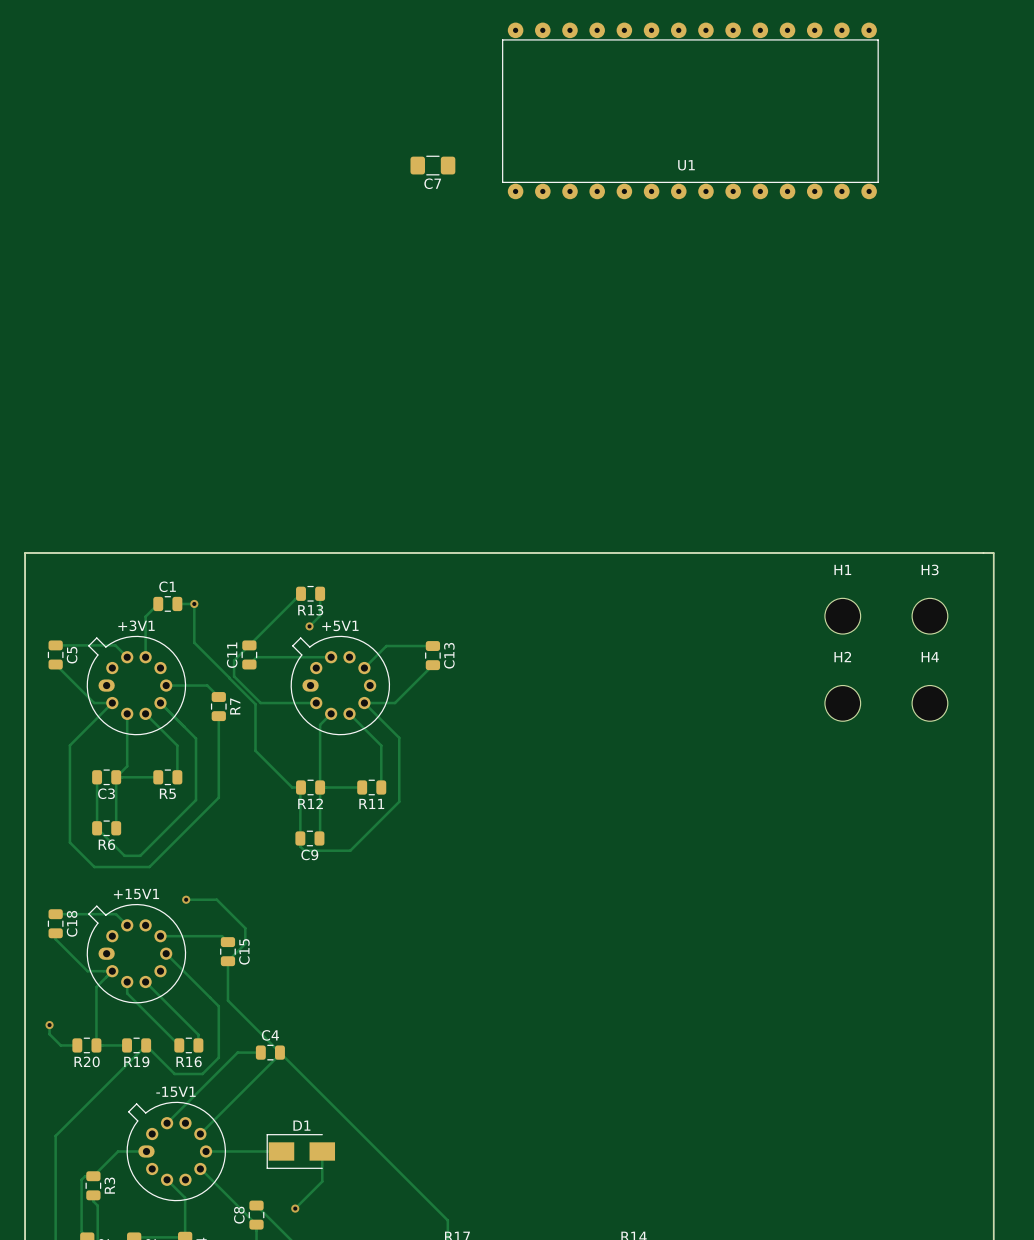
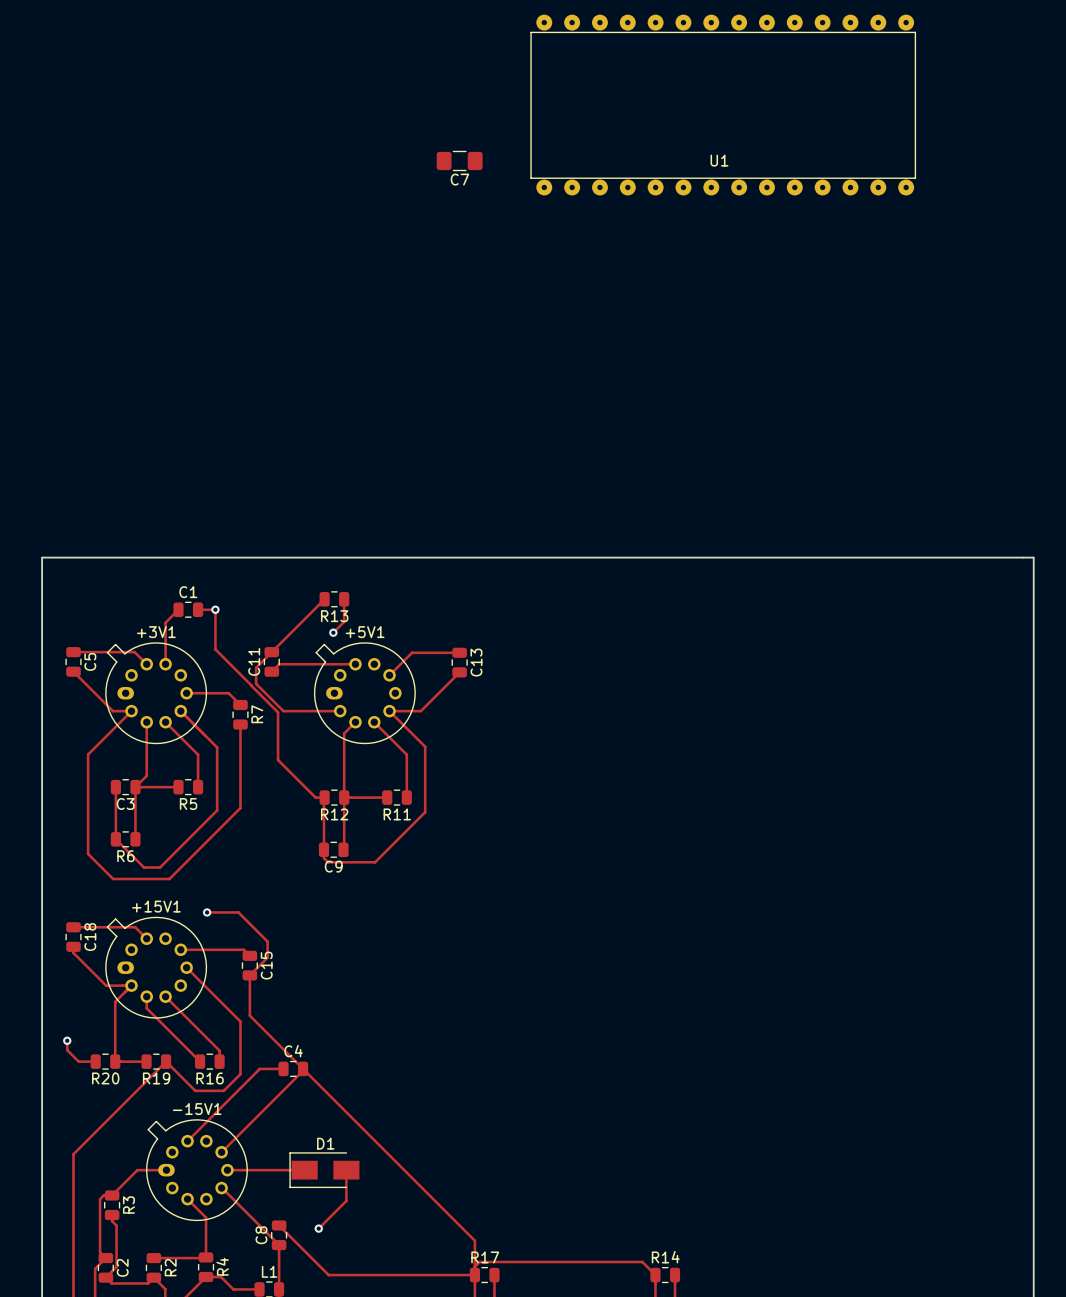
H1: (842, 616) -> none
H3: (929, 616) -> none
H2: (842, 703) -> none
H4: (929, 703) -> none

